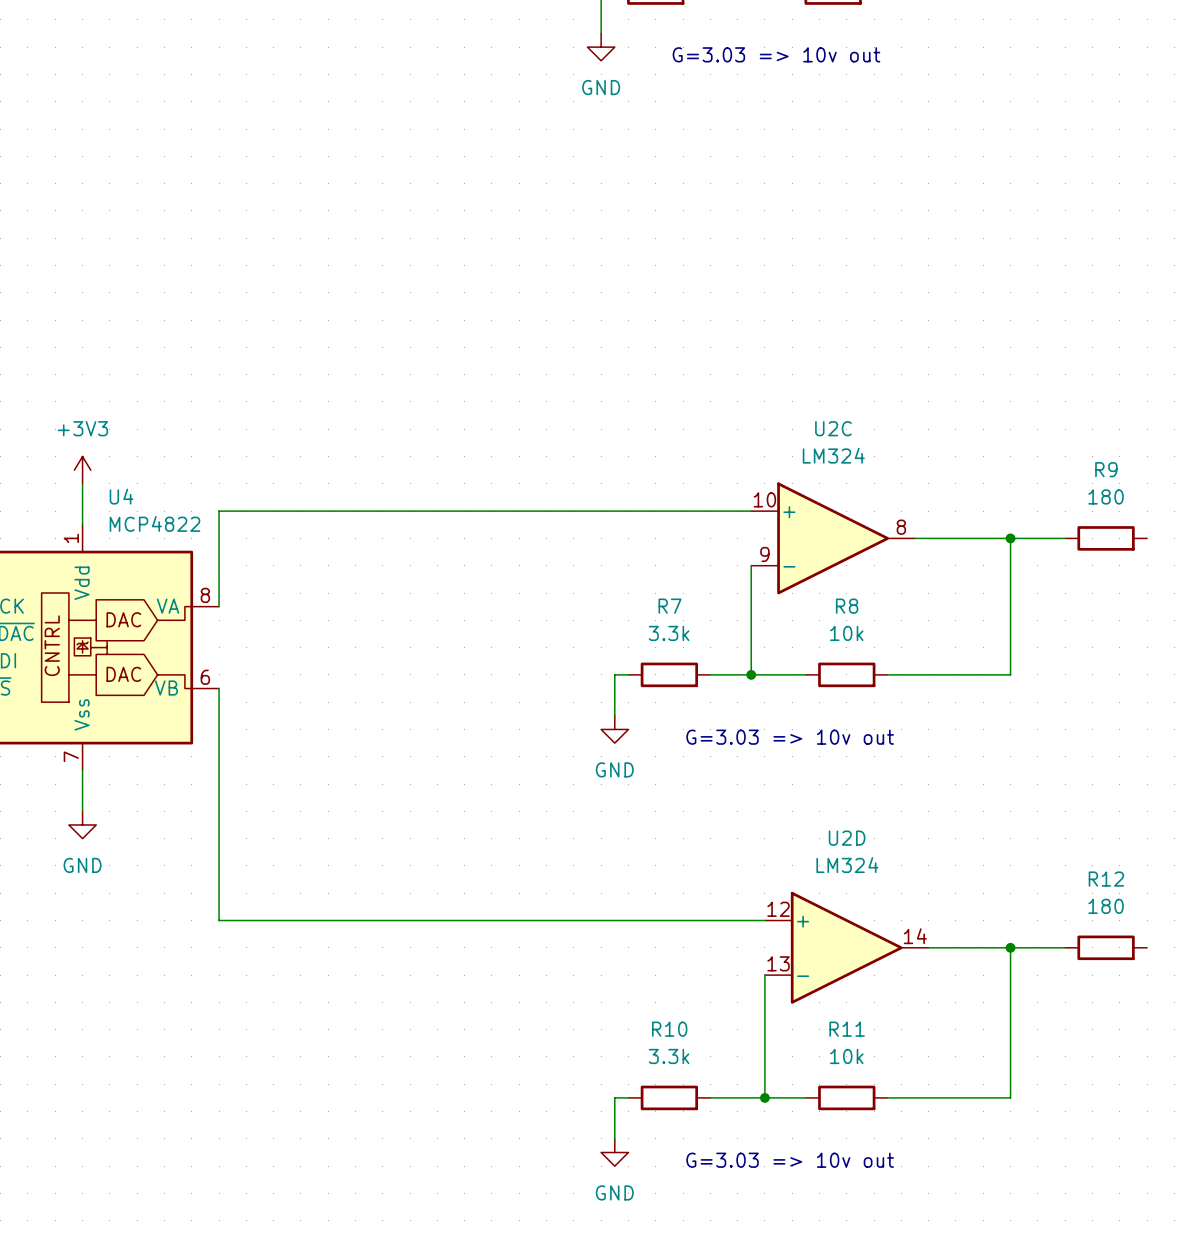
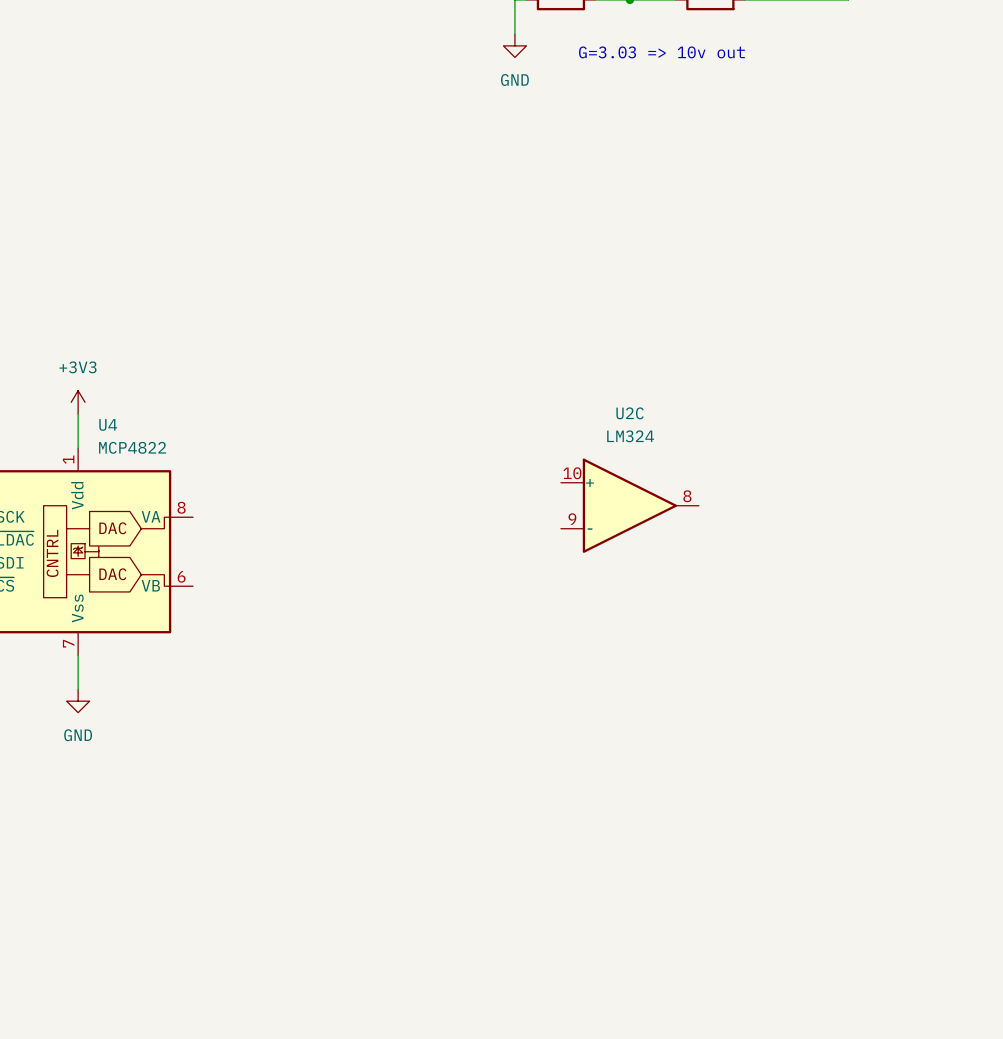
wire: (751, 511) (219, 511) (219, 606) -> none
U2C position: (833, 538) -> (629, 505)
wire: (915, 538) (1065, 538) -> none
wire: (1010, 538) (1010, 674) (887, 674) -> none
junction: (1010, 538) -> none
R9: 180 (1106, 538) -> none
wire: (751, 565) (751, 674) -> none
wire: (628, 674) (614, 674) (614, 715) -> none
R7: 3.3k (669, 674) -> none
wire: (710, 674) (805, 674) -> none
junction: (751, 674) -> none
R8: 10k (846, 674) -> none
wire: (219, 688) (219, 920) (764, 920) -> none
power symbol: GND (614, 729) -> none
text: G=3.03 => 10v out (790, 737) -> none
U2D: LM324 (846, 947) -> none
wire: (928, 947) (1065, 947) -> none
wire: (1010, 947) (1010, 1097) (887, 1097) -> none
junction: (1010, 947) -> none
R12: 180 (1106, 947) -> none
wire: (764, 975) (764, 1097) -> none
wire: (628, 1097) (614, 1097) (614, 1138) -> none
R10: 3.3k (669, 1097) -> none
wire: (710, 1097) (805, 1097) -> none
junction: (764, 1097) -> none
R11: 10k (846, 1097) -> none
power symbol: GND (614, 1152) -> none
text: G=3.03 => 10v out (790, 1160) -> none

